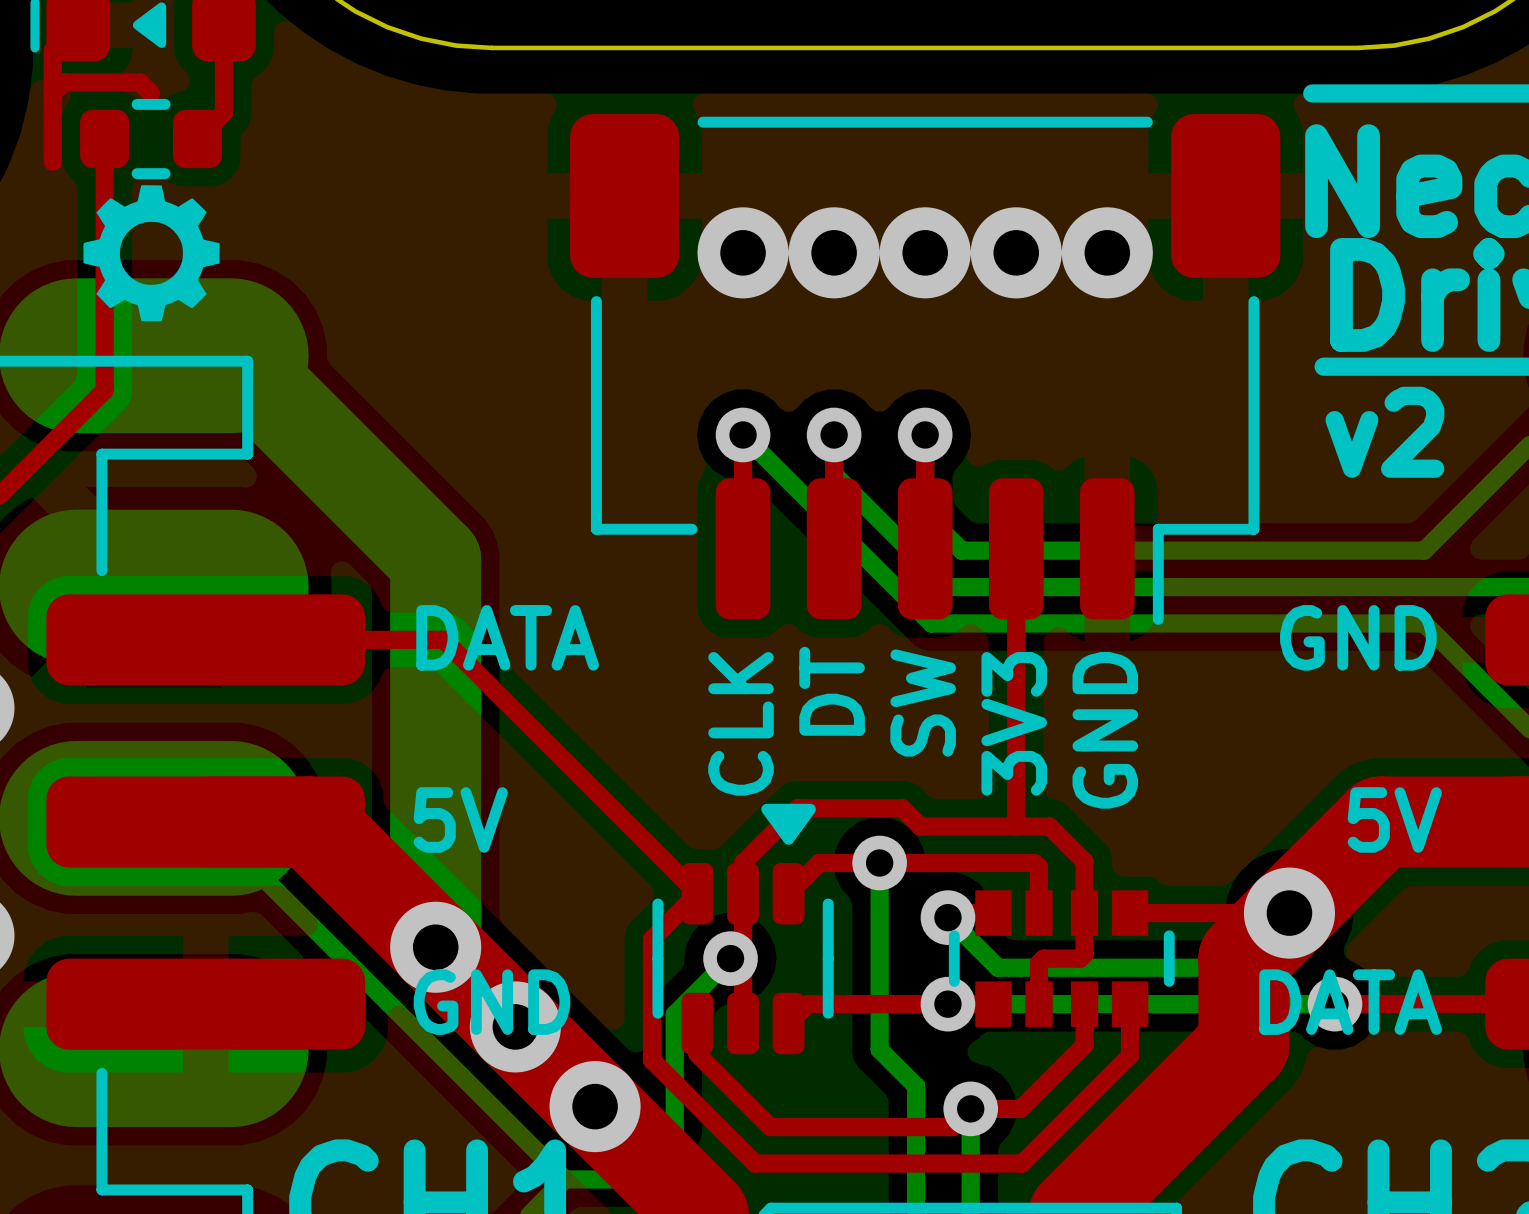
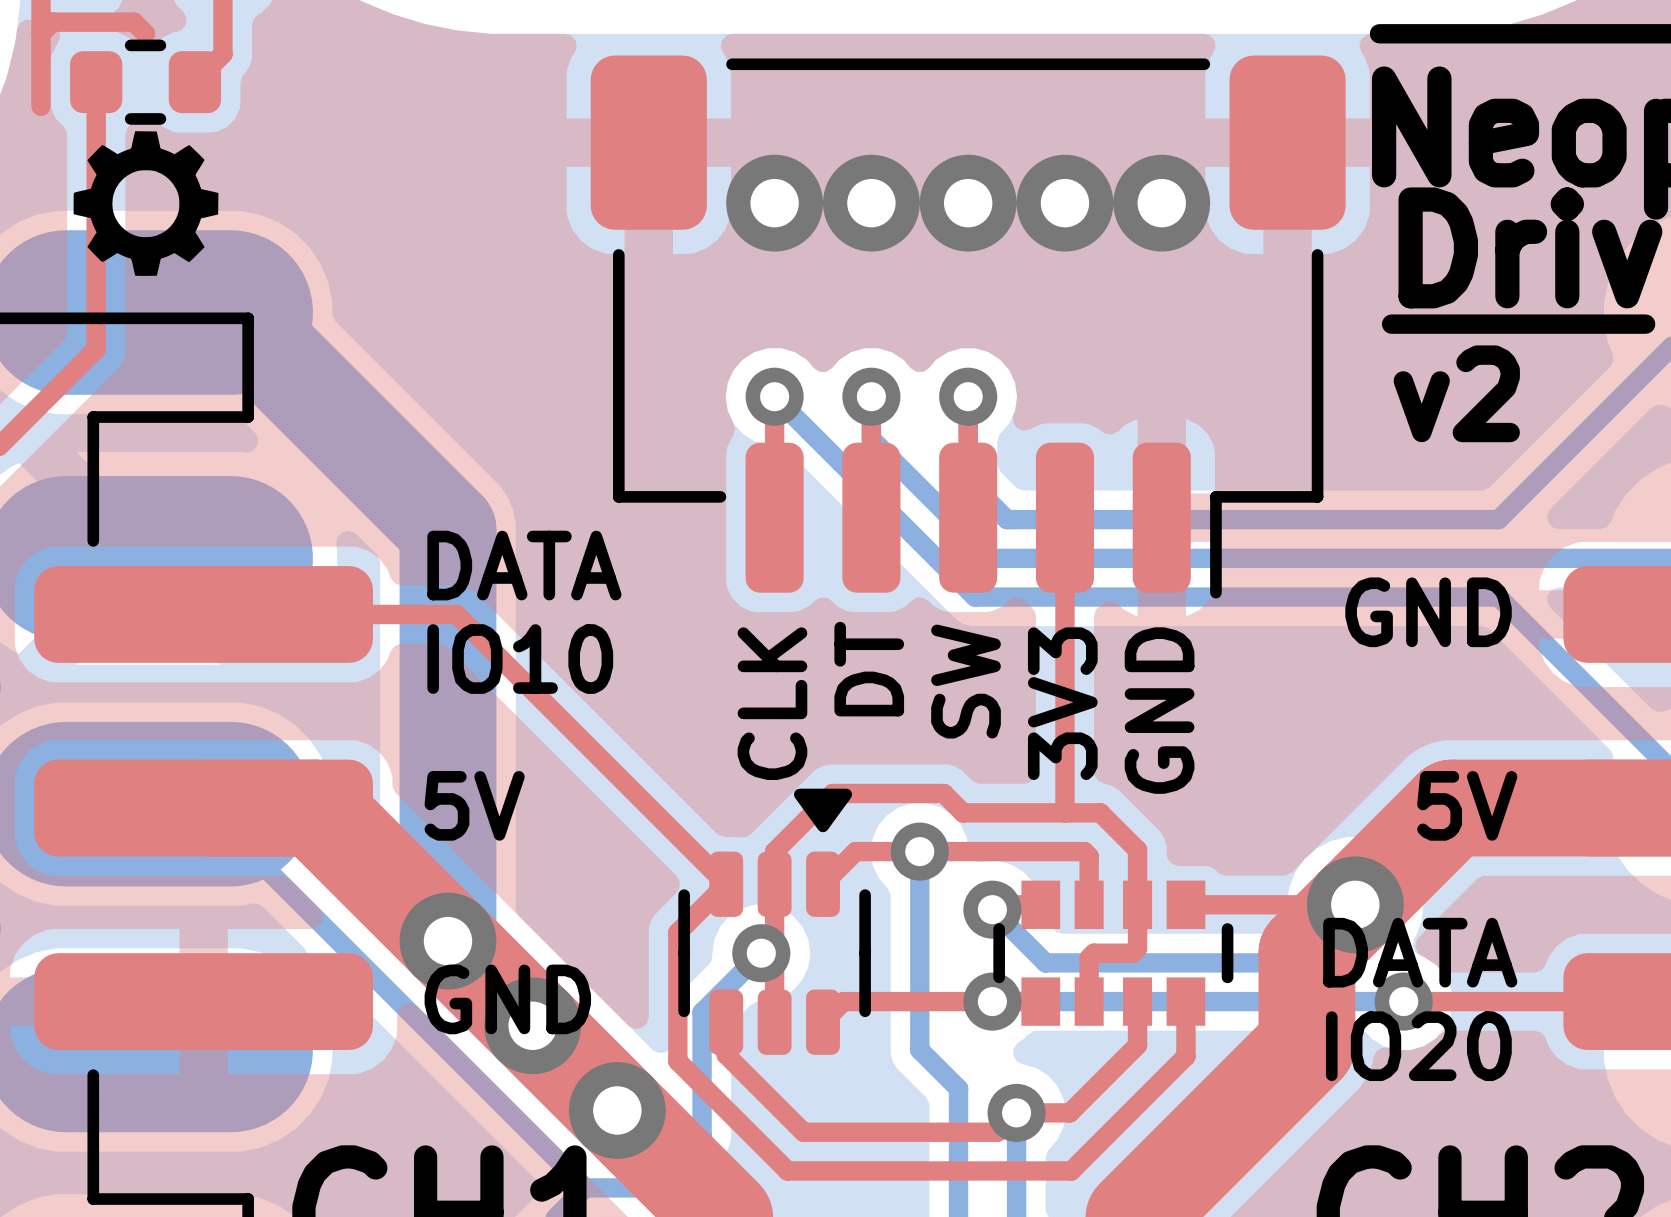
text position: DATA (507, 637) -> DATA (524, 565)
text: none -> IO10 (520, 659)
text position: DATA (1350, 1002) -> DATA (1420, 952)
text: none -> IO20 (1418, 1046)

